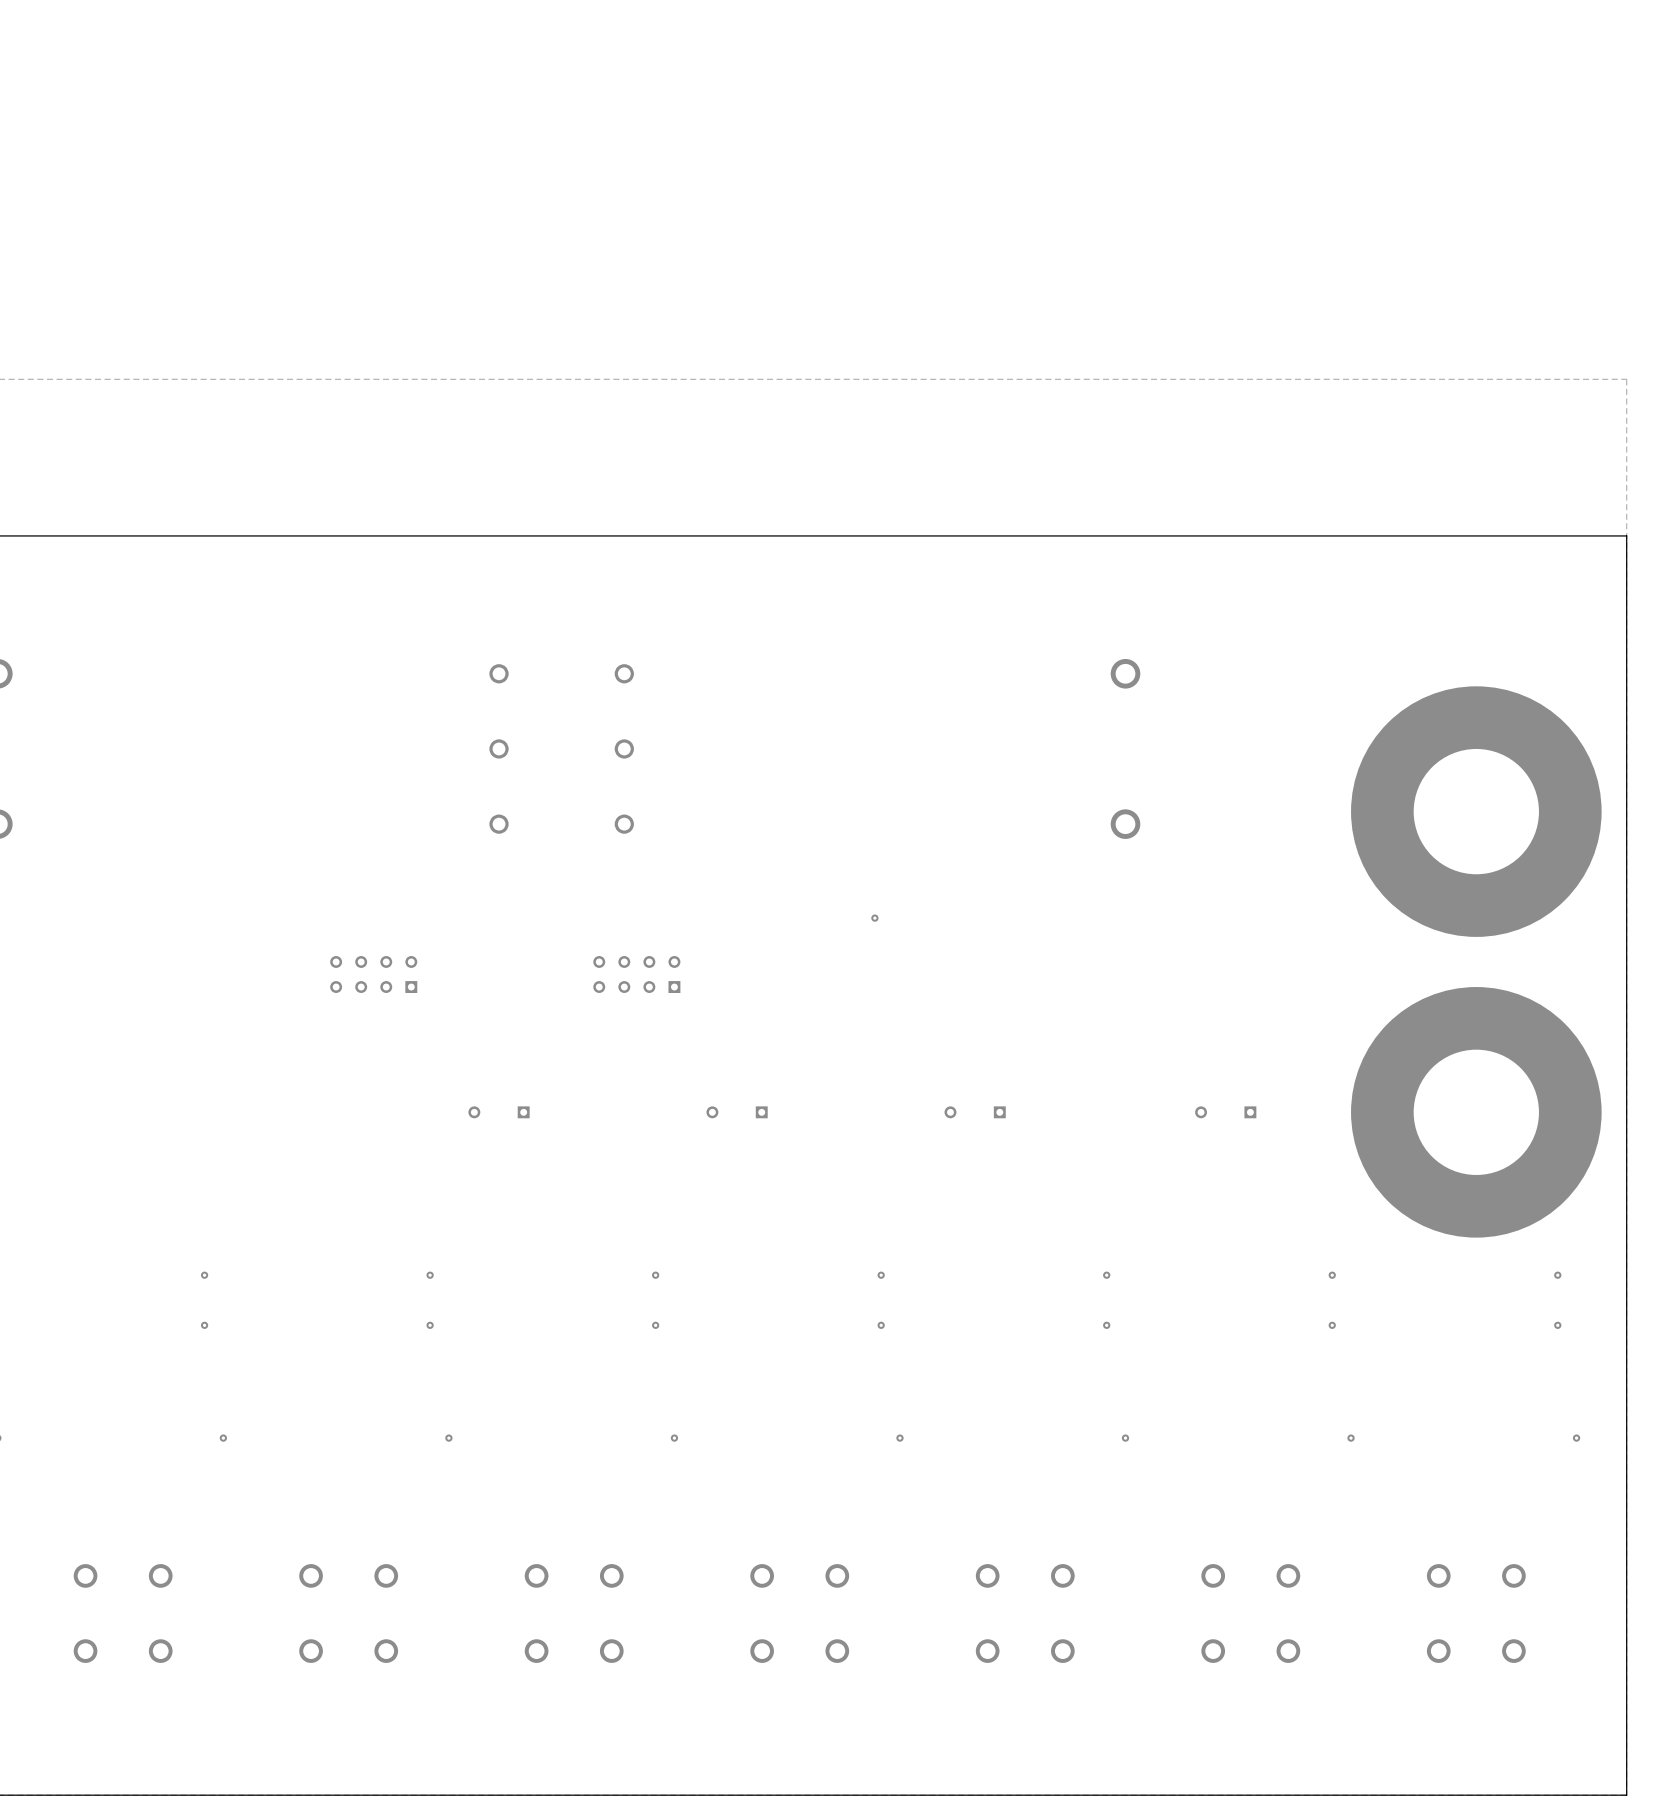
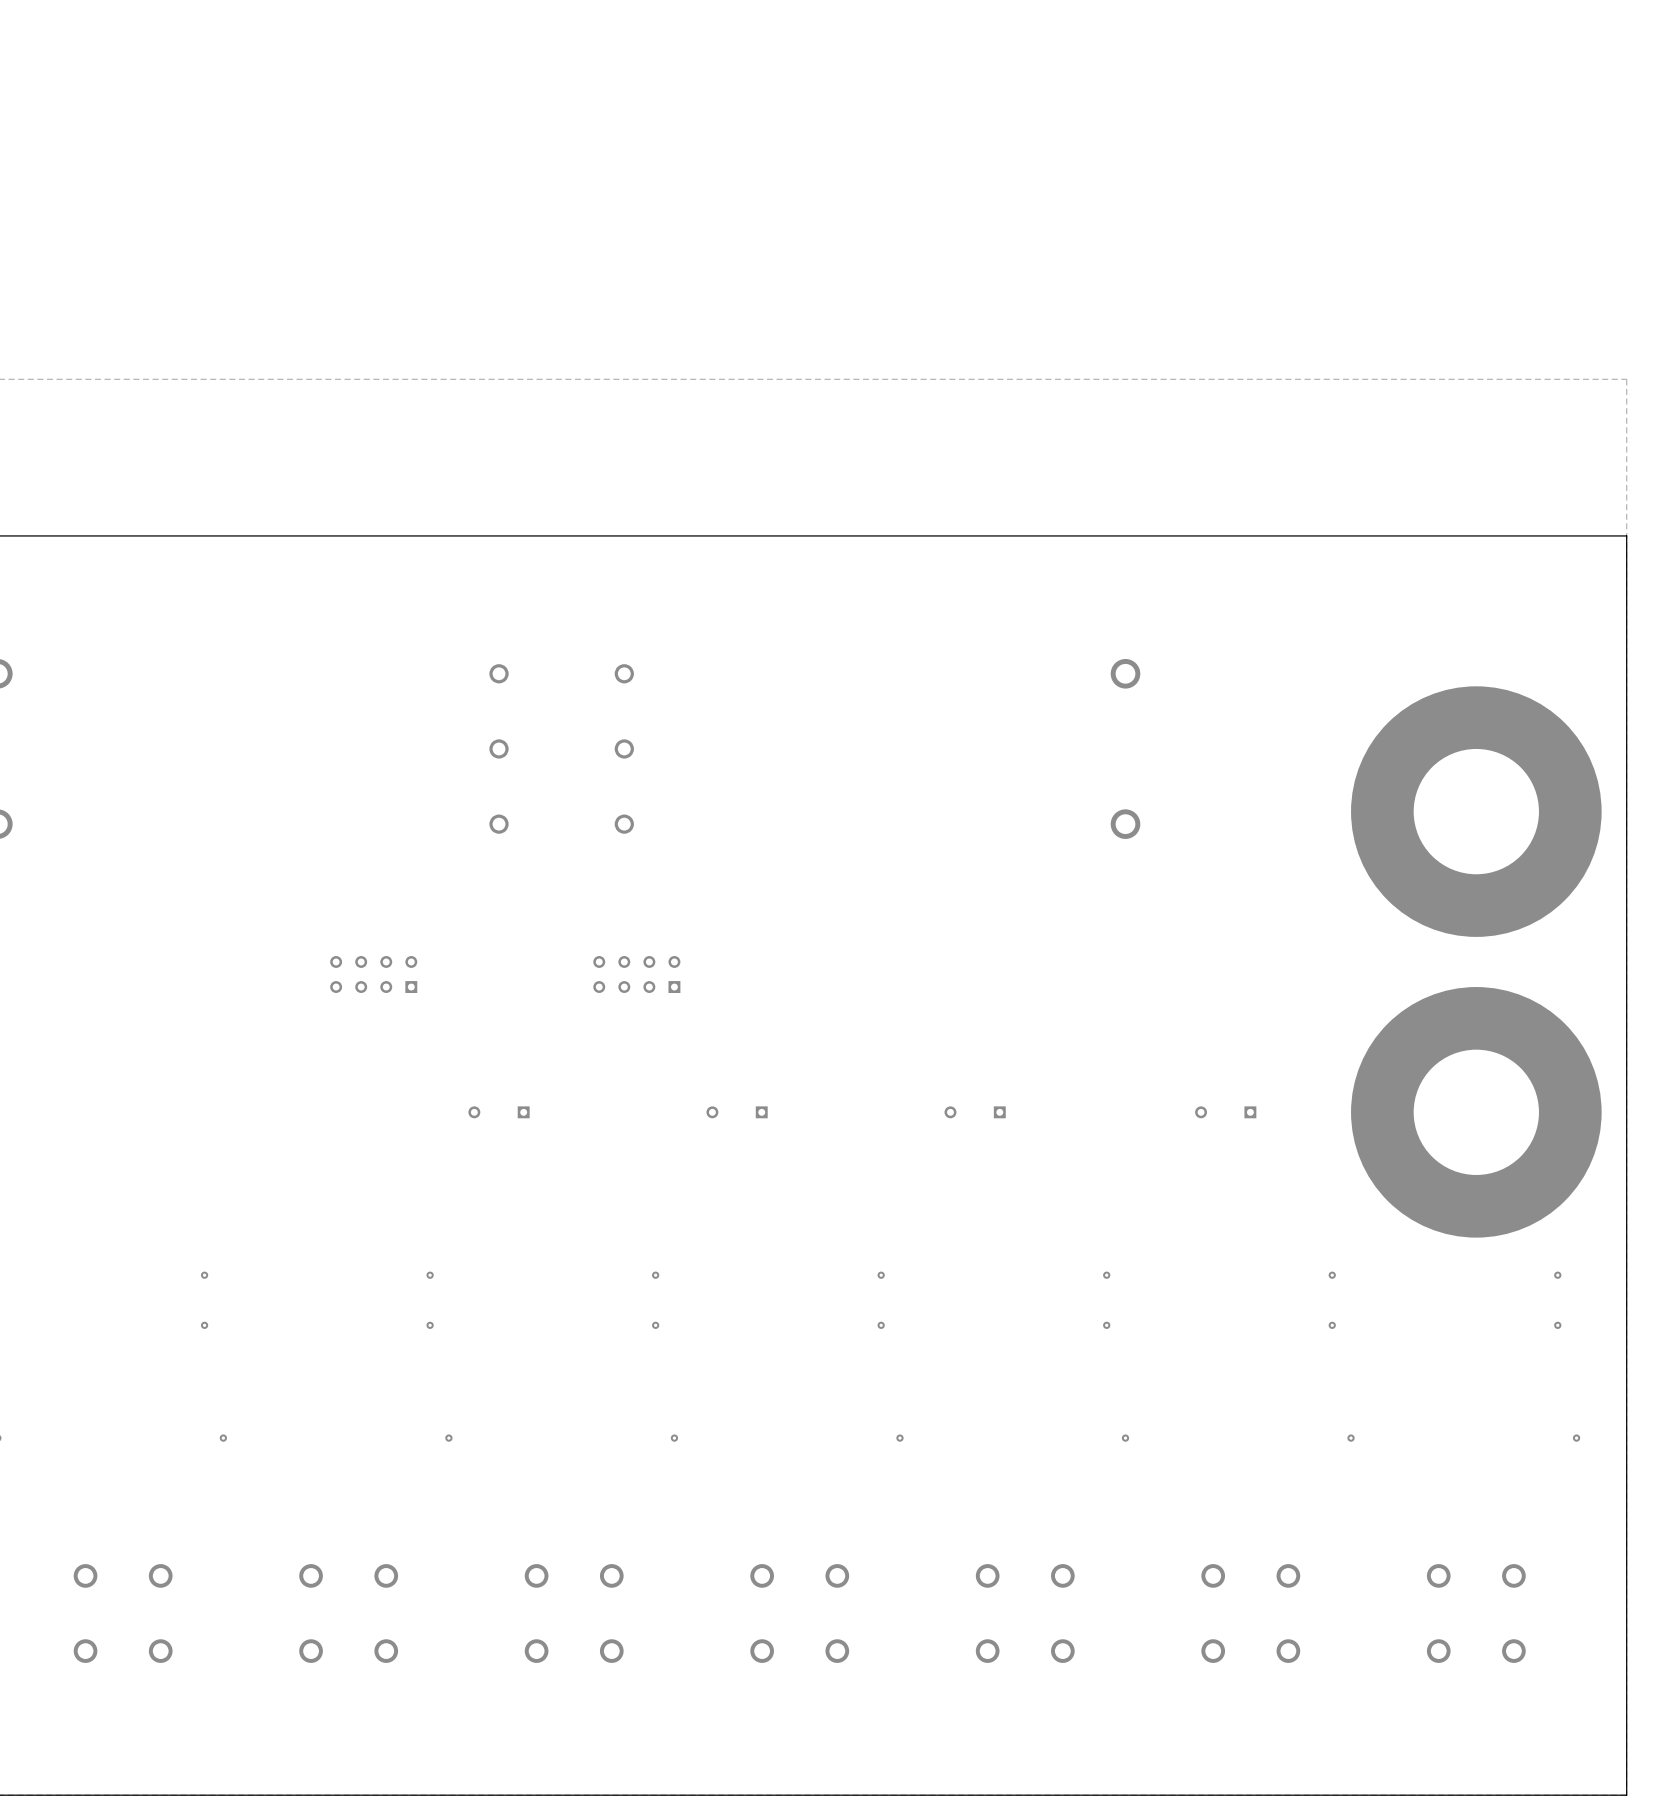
via: (874, 918) -> none

